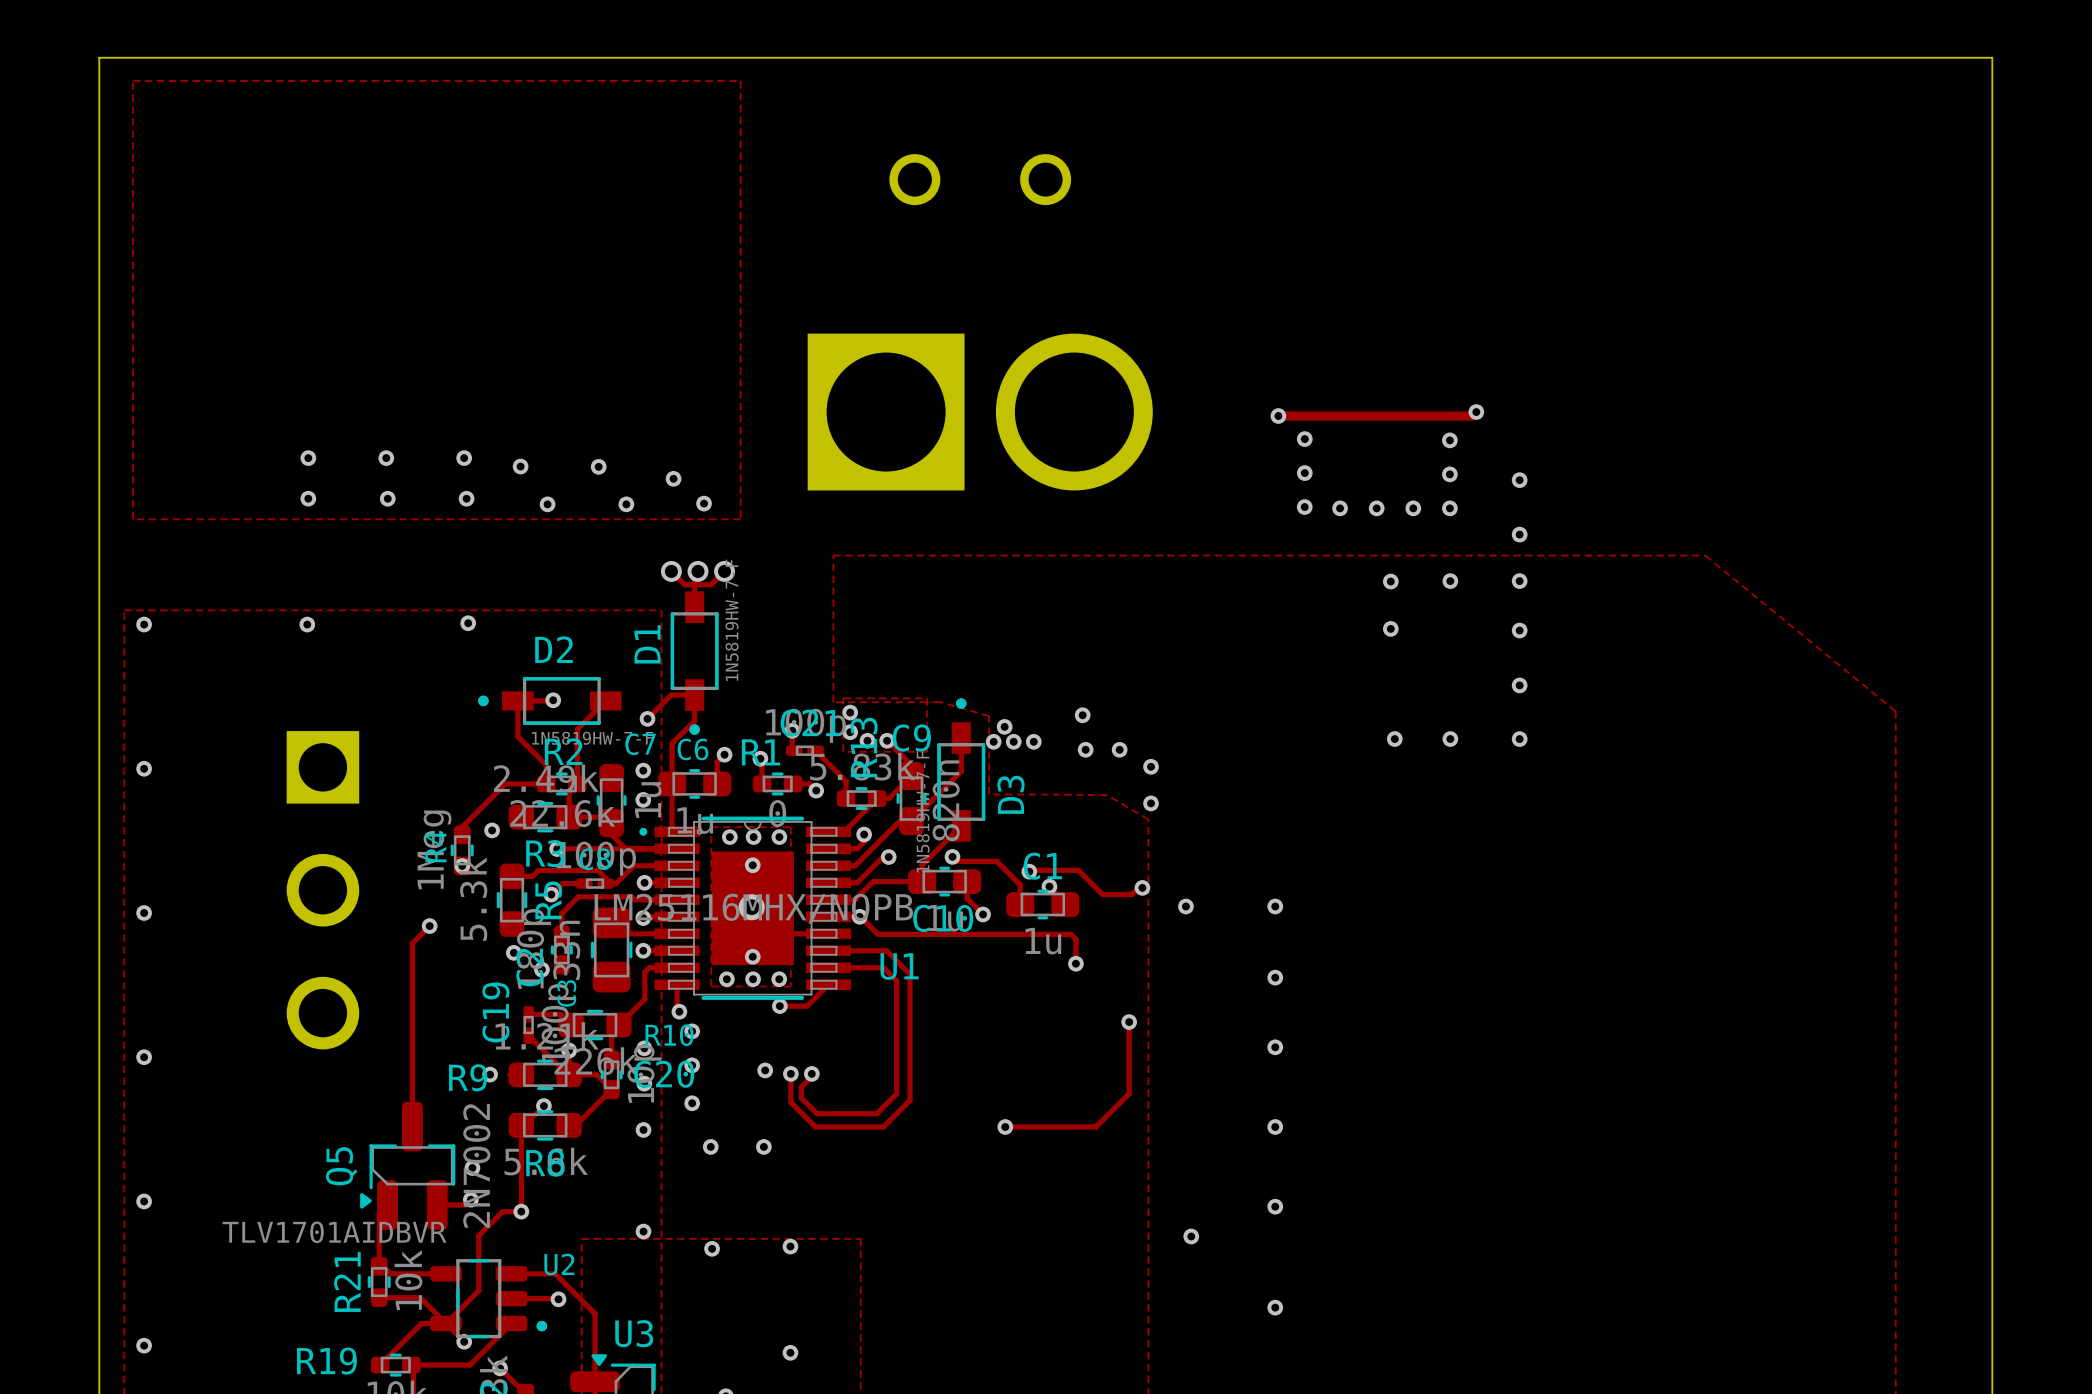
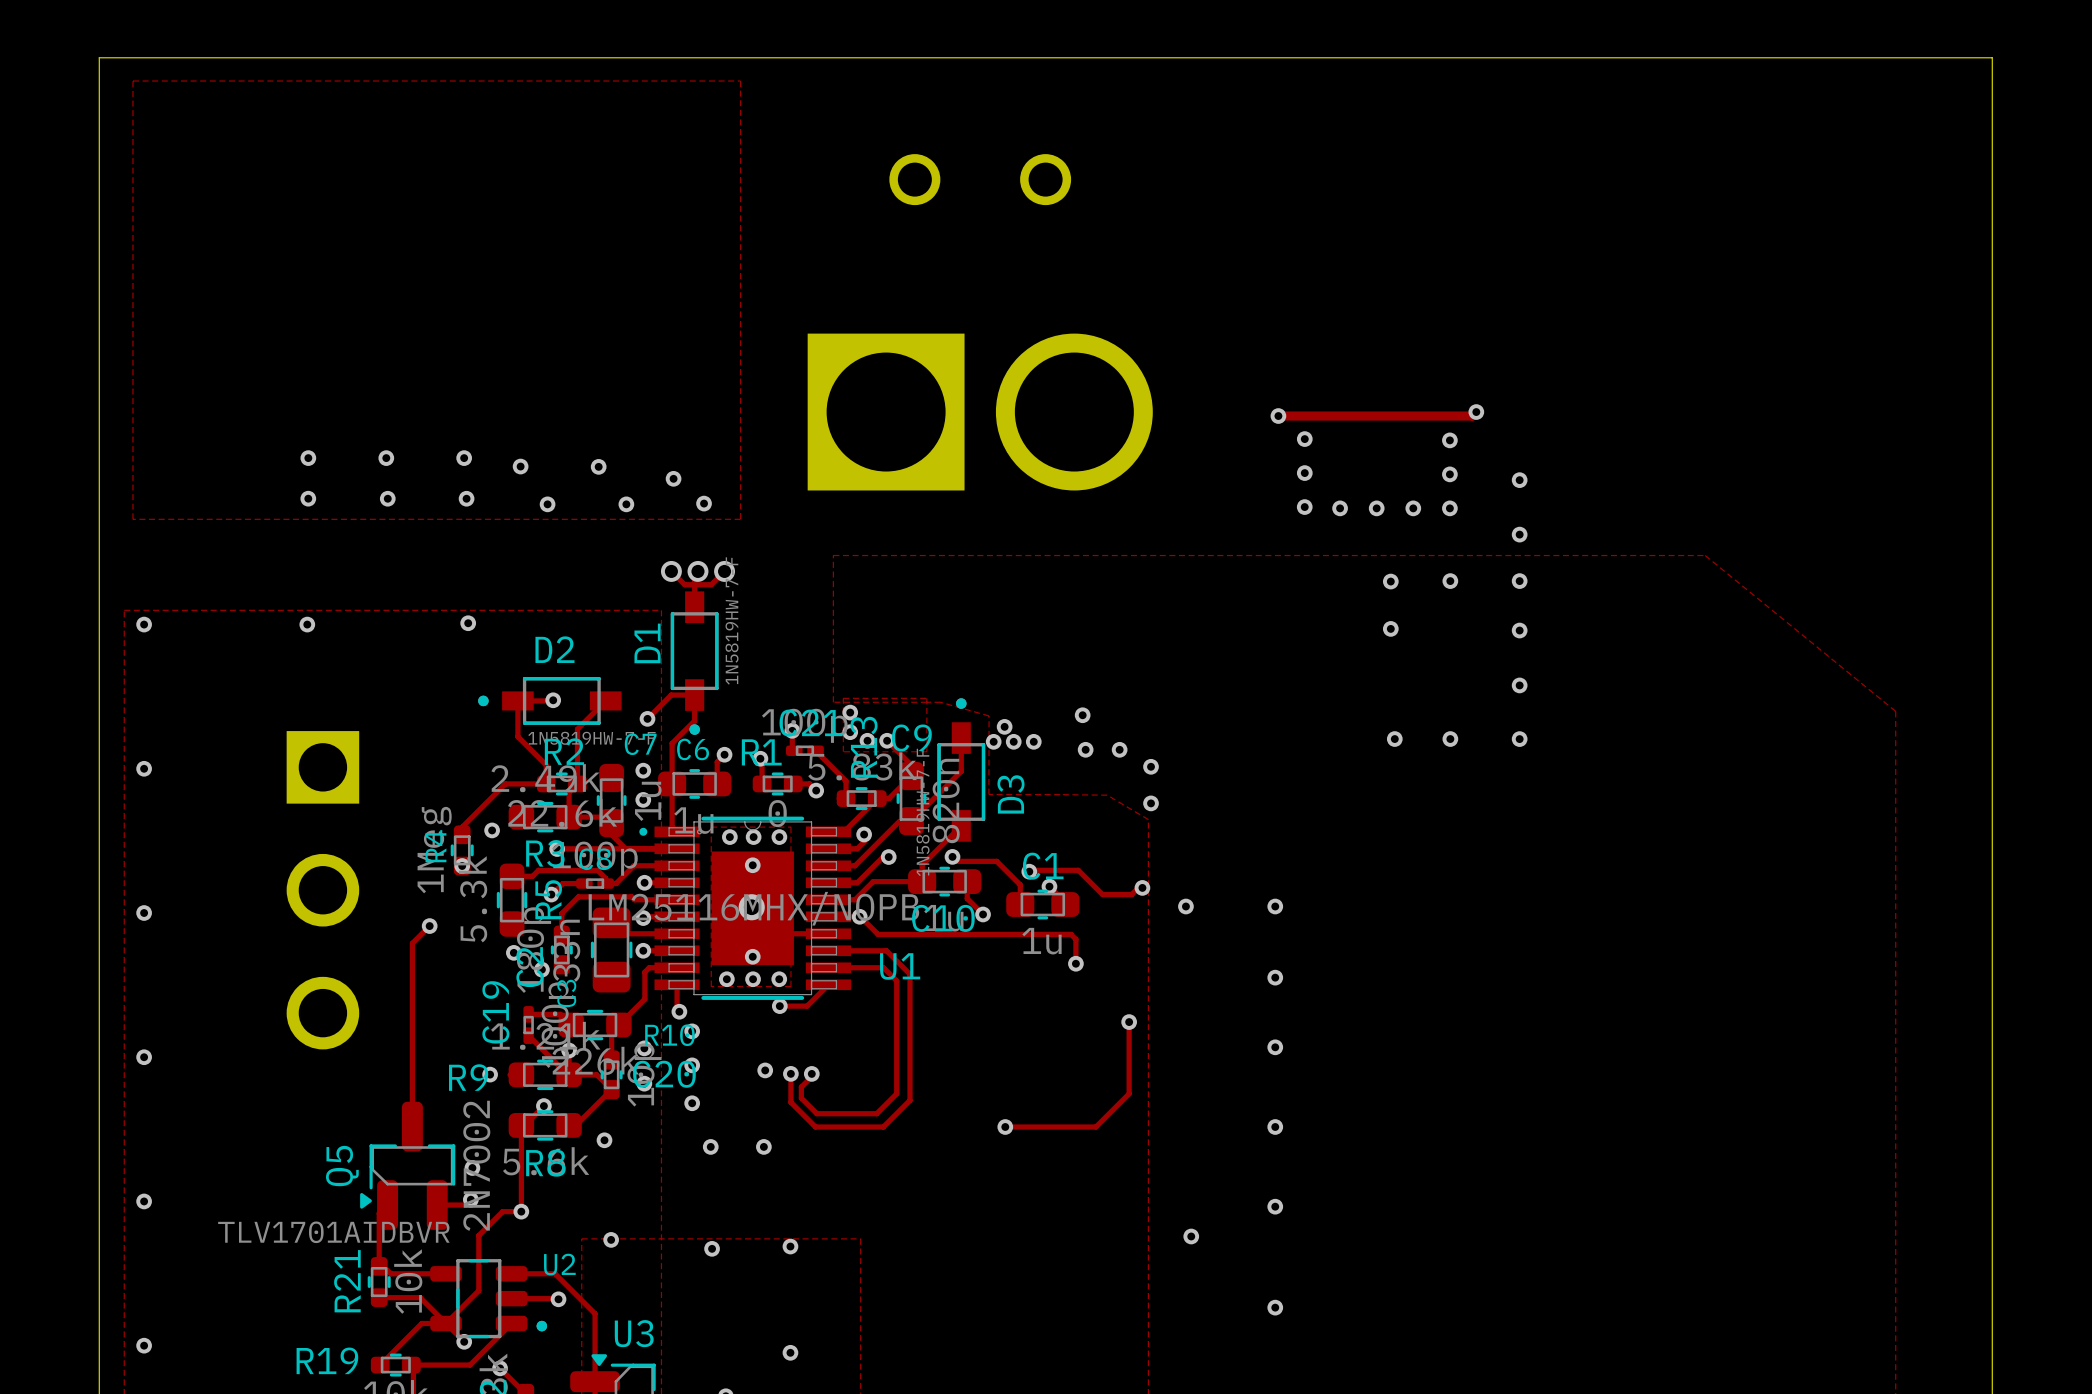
via position: (643, 1129) -> (604, 1140)
via position: (643, 1231) -> (611, 1239)

